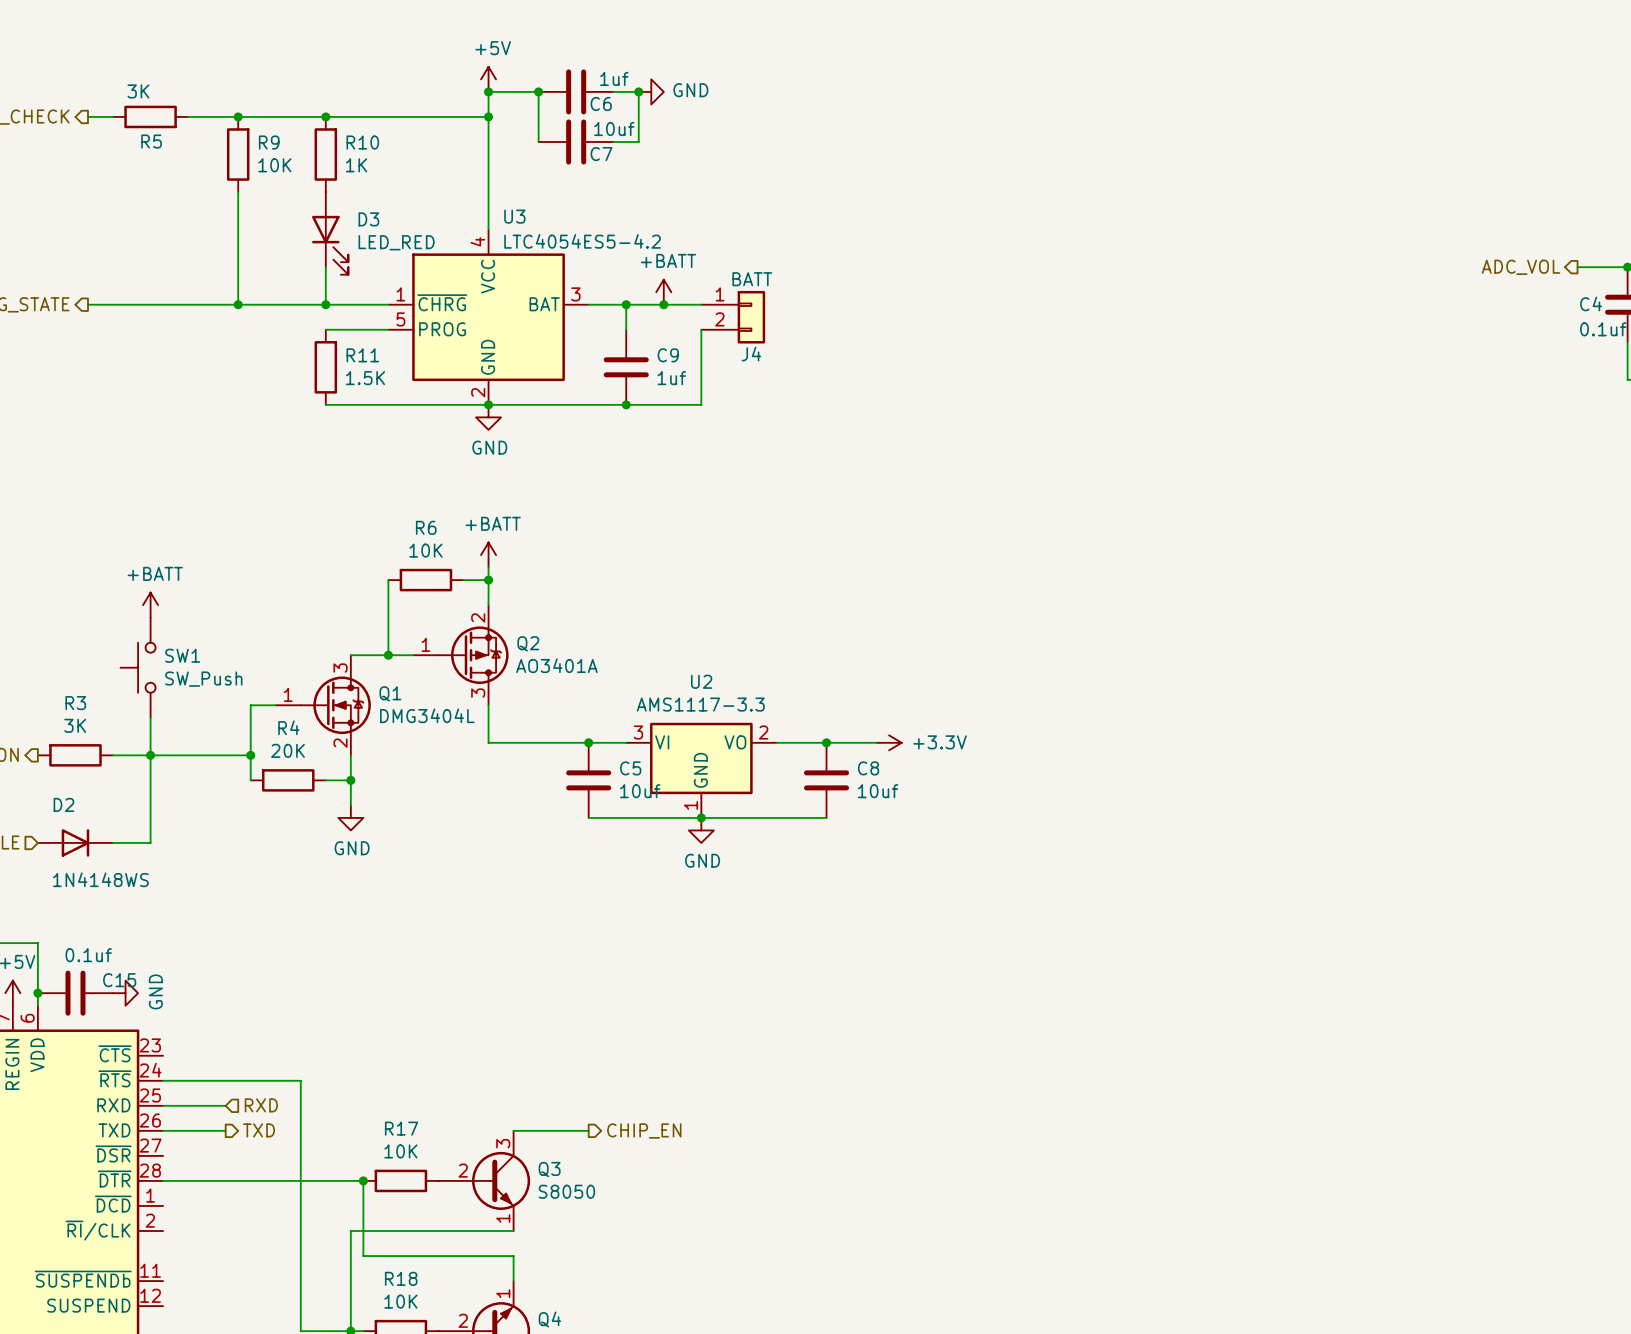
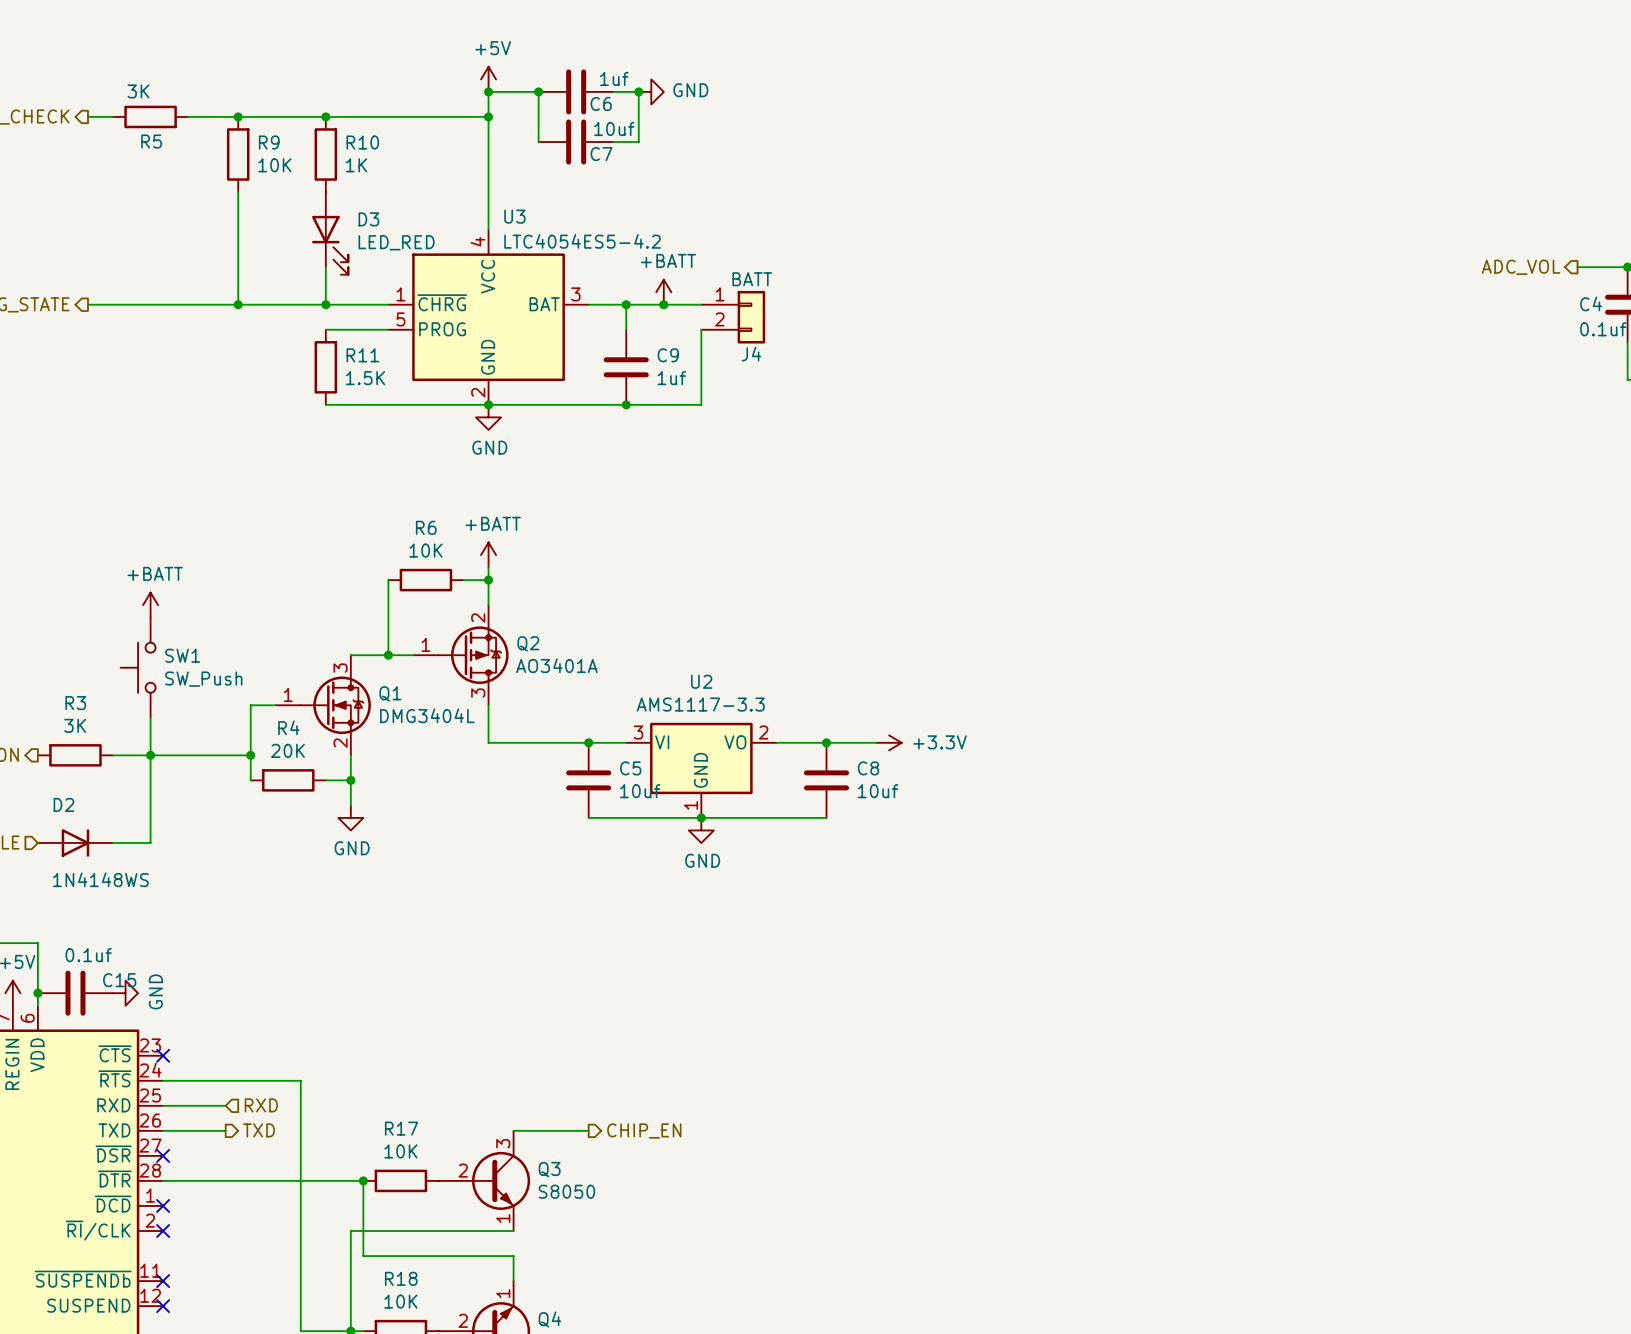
no-connect mark: none -> (163, 1055)
no-connect mark: none -> (163, 1155)
no-connect mark: none -> (163, 1205)
no-connect mark: none -> (163, 1231)
no-connect mark: none -> (163, 1281)
no-connect mark: none -> (163, 1306)

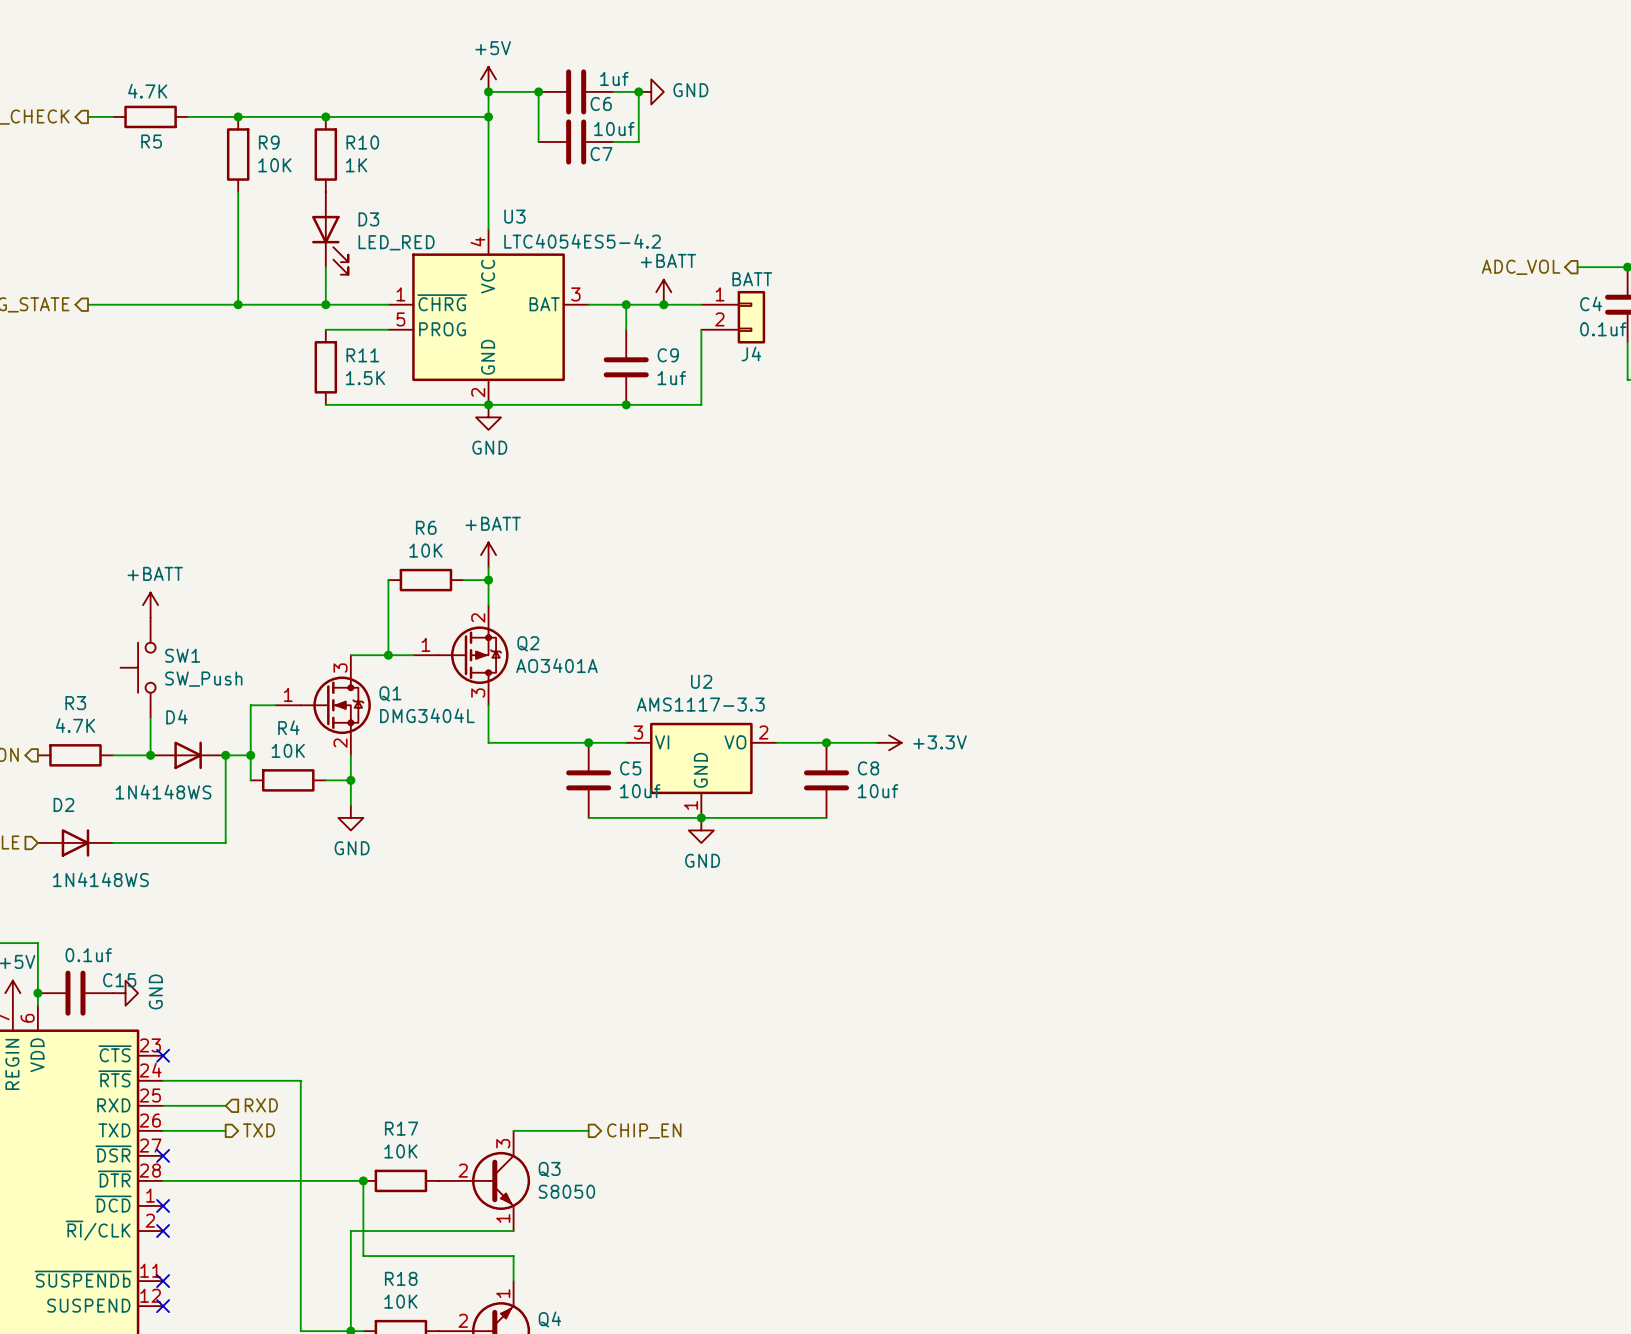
R5 value: 3K (138, 91) -> 4.7K (147, 91)
R3 value: 3K (75, 725) -> 4.7K (75, 725)
R4 value: 20K (287, 750) -> 10K (288, 750)
D4: none -> 1N4148WS (188, 755)
wire: (225, 755) (150, 755) (150, 842) -> (225, 755) (225, 842) (150, 842)
junction: none -> (225, 755)

